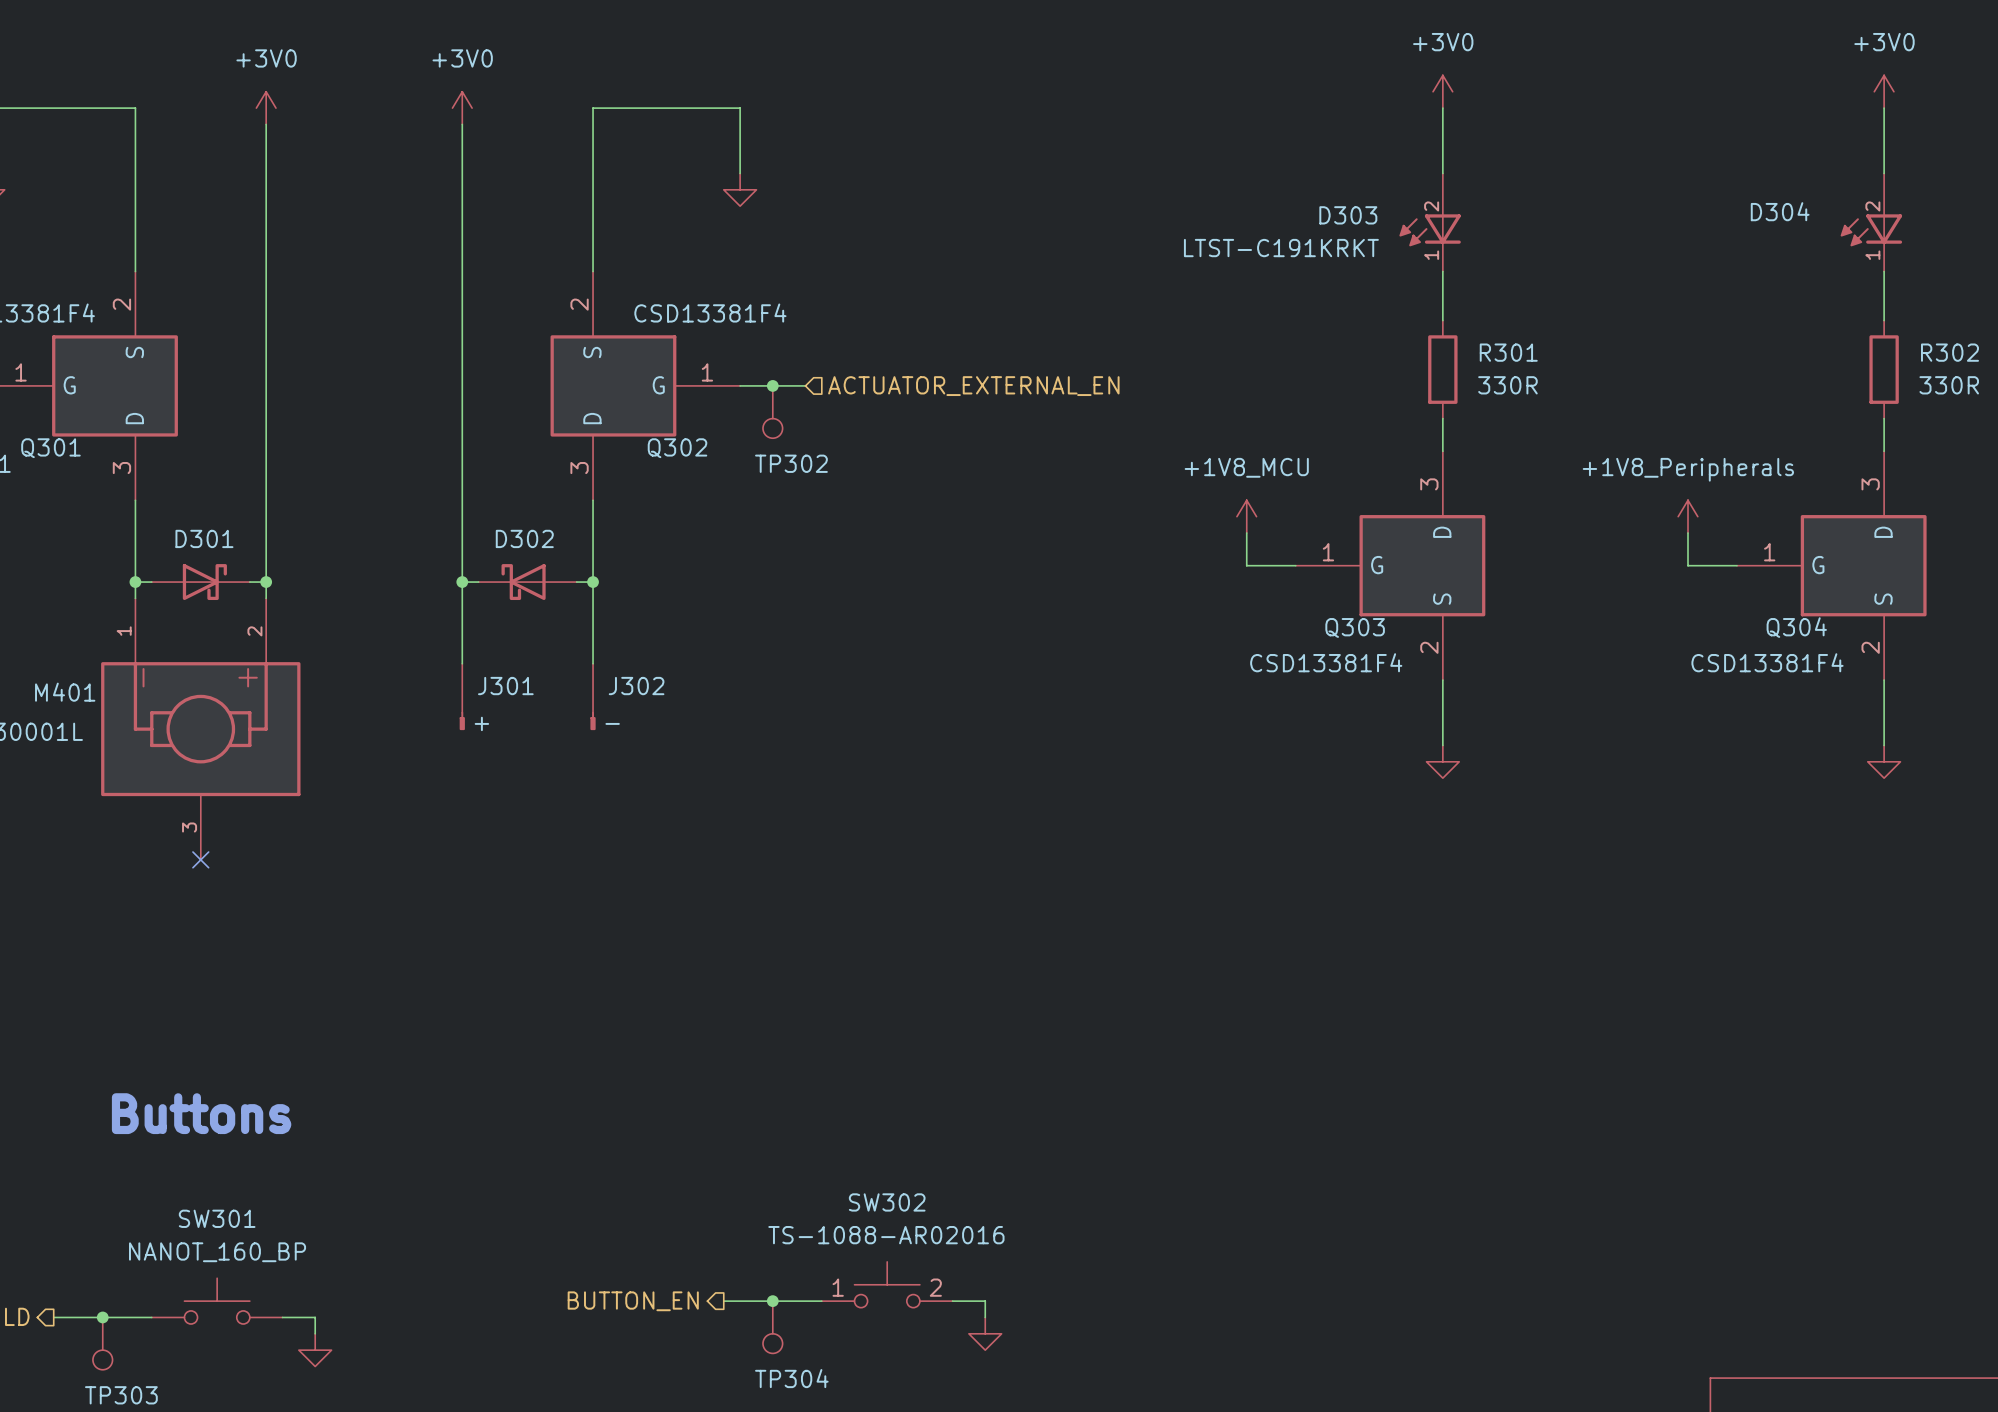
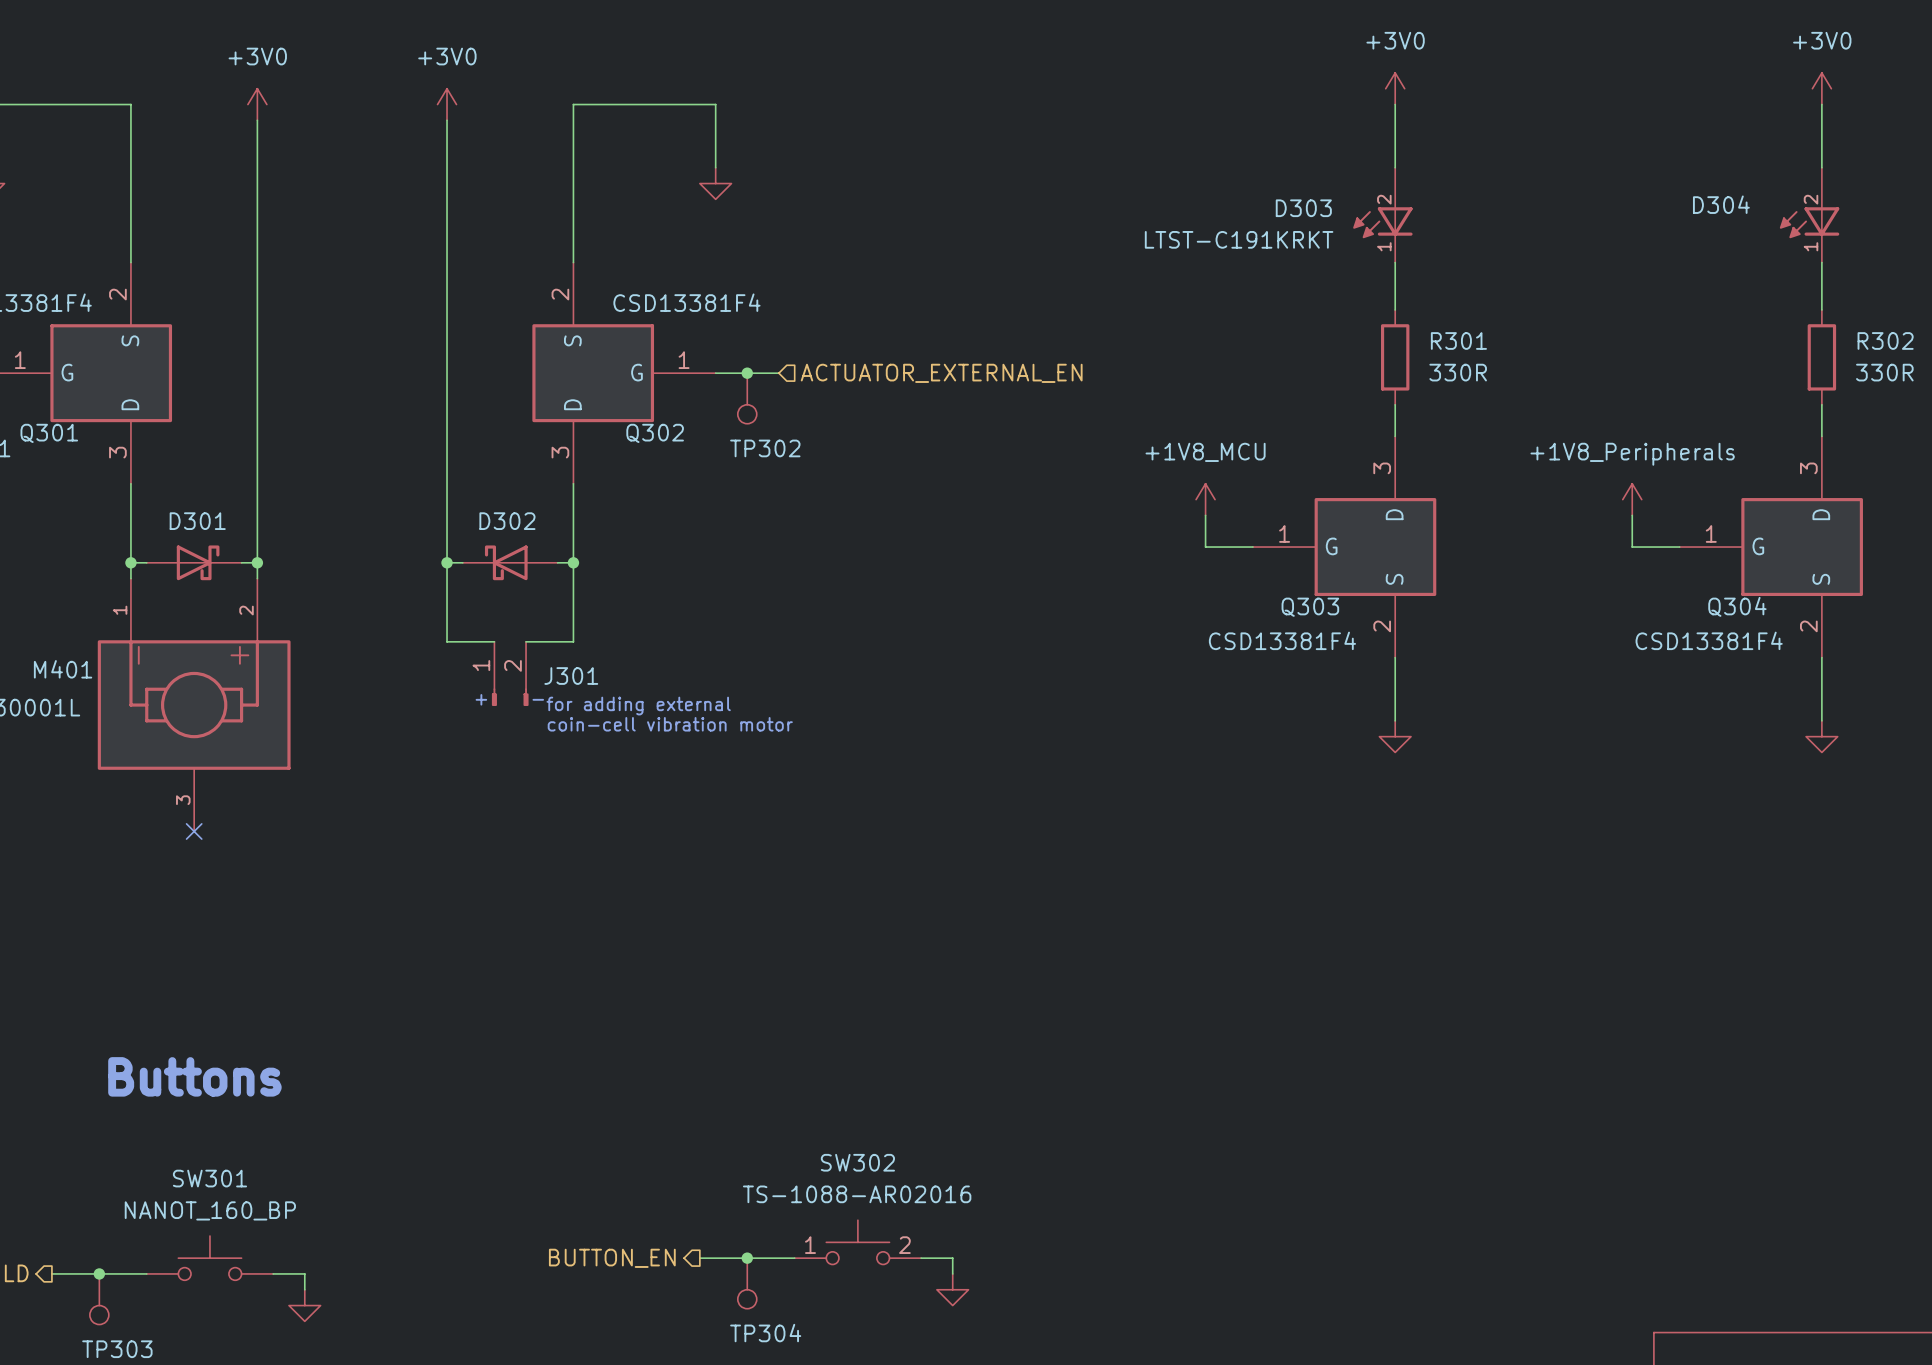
J301 symbol: [459, 663, 465, 731] -> [491, 641, 529, 707]
wire: none -> (447, 641) (494, 641)
wire: none -> (526, 641) (573, 641)
J302: - (593, 696) -> none
J301 value: + (481, 723) -> none
text: none -> + (481, 699)
text: none -> - (538, 699)
text: none -> for adding external (638, 706)
text: none -> coin-cell vibration motor (670, 724)

